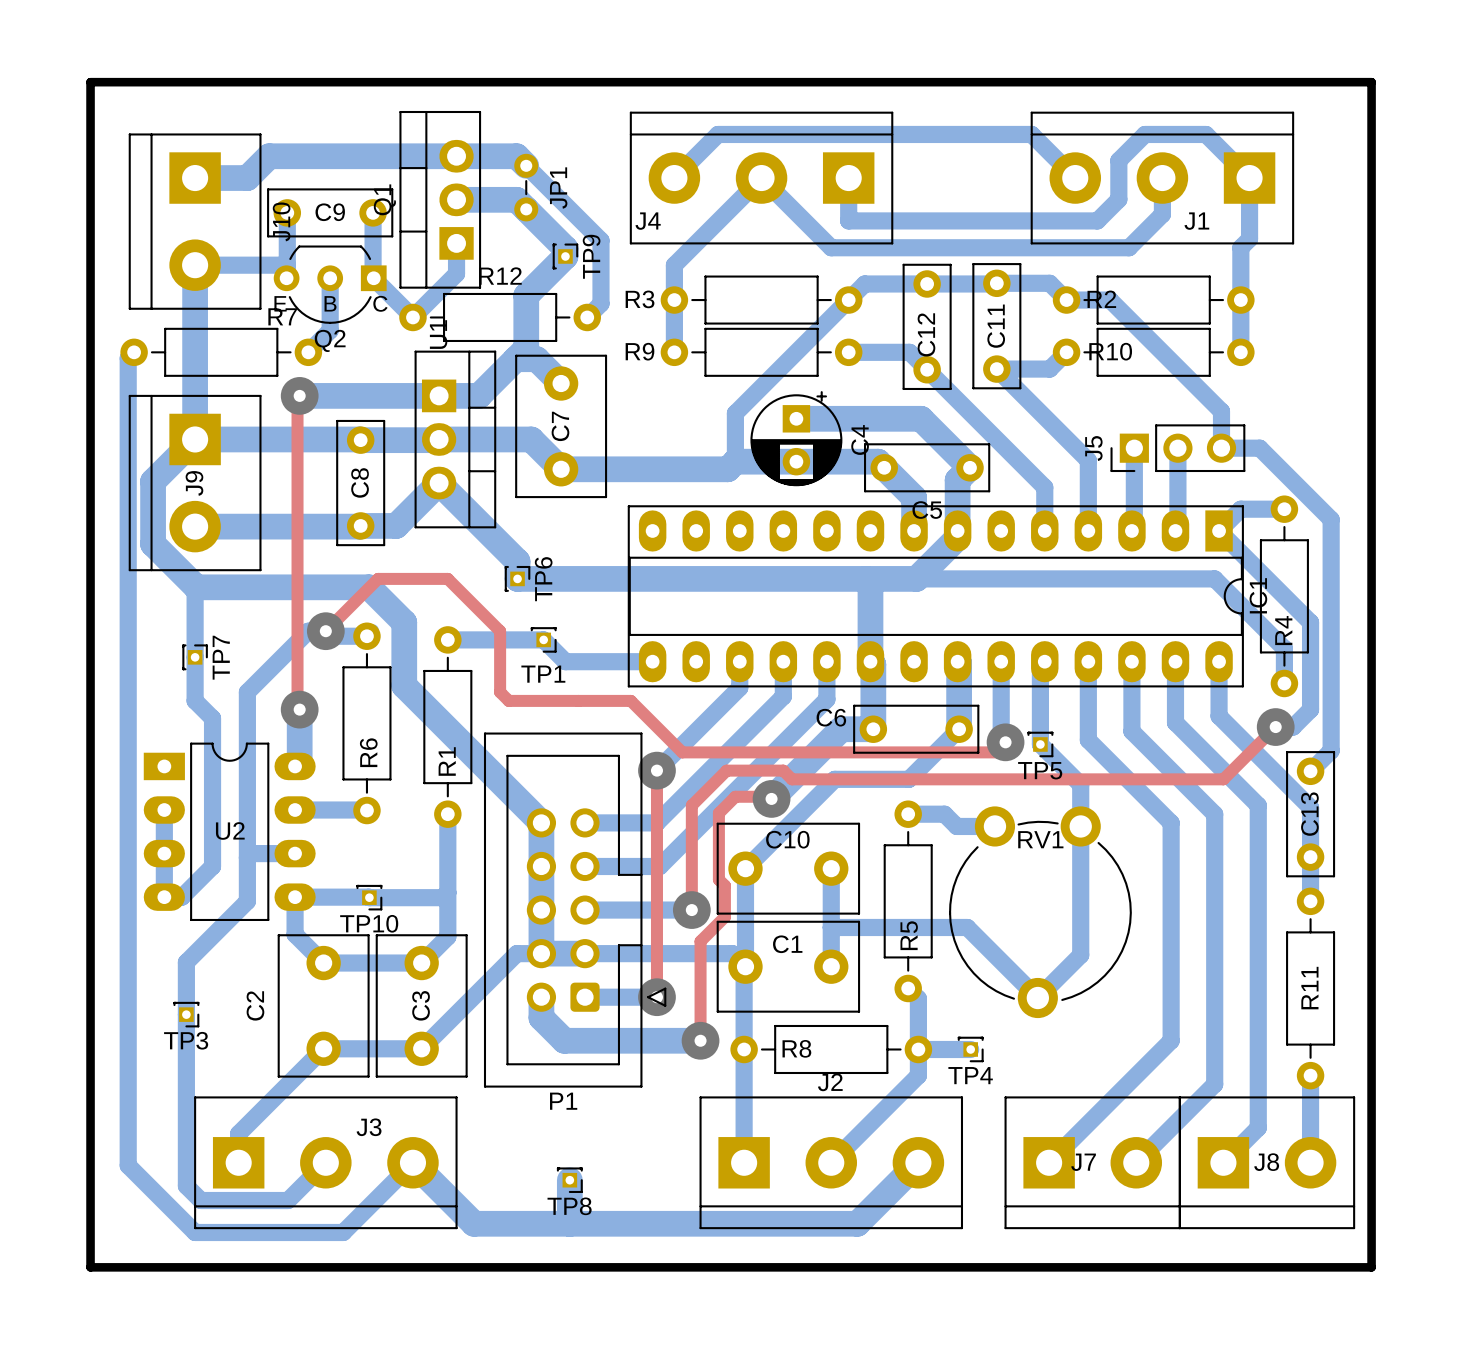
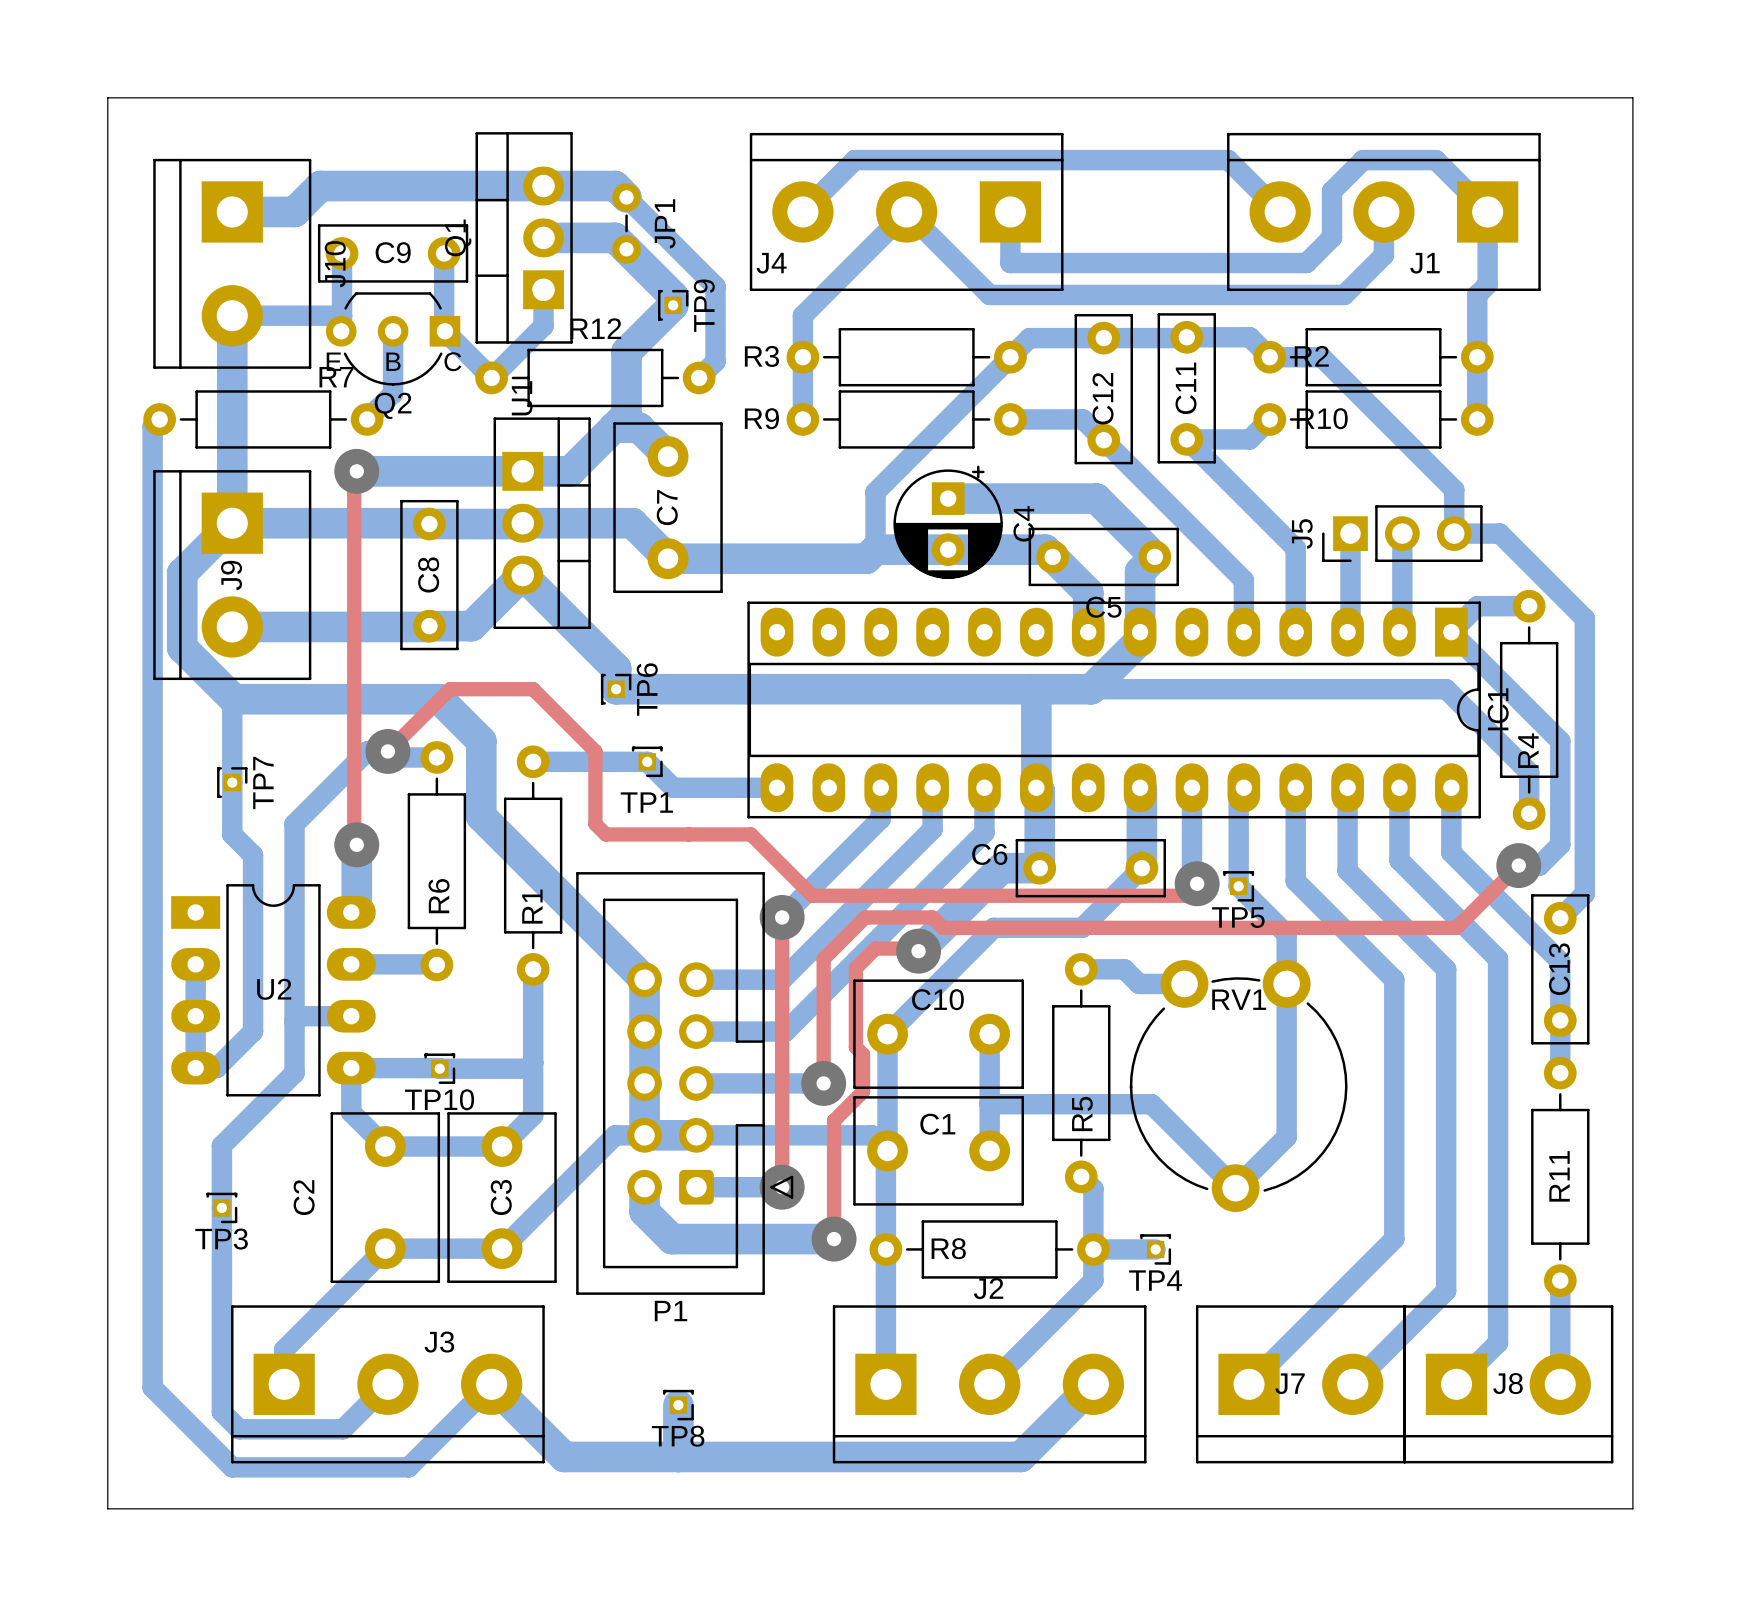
board edge width: thick (90, 82) (1371, 82) (1371, 1267) (90, 1267) (90, 82) -> thin (107, 97) (1632, 97) (1632, 1508) (107, 1508) (107, 97)

